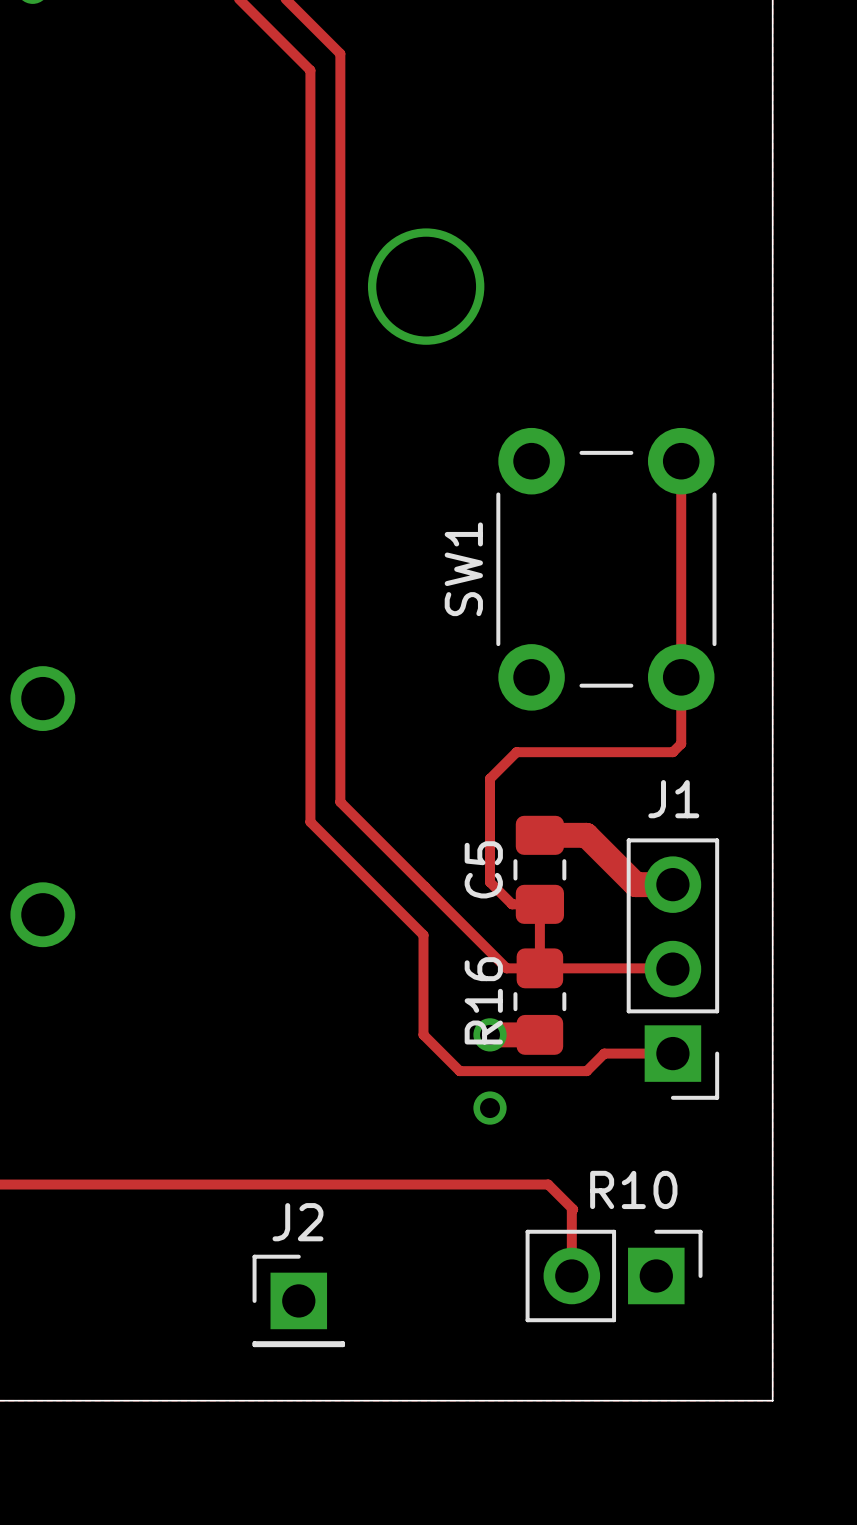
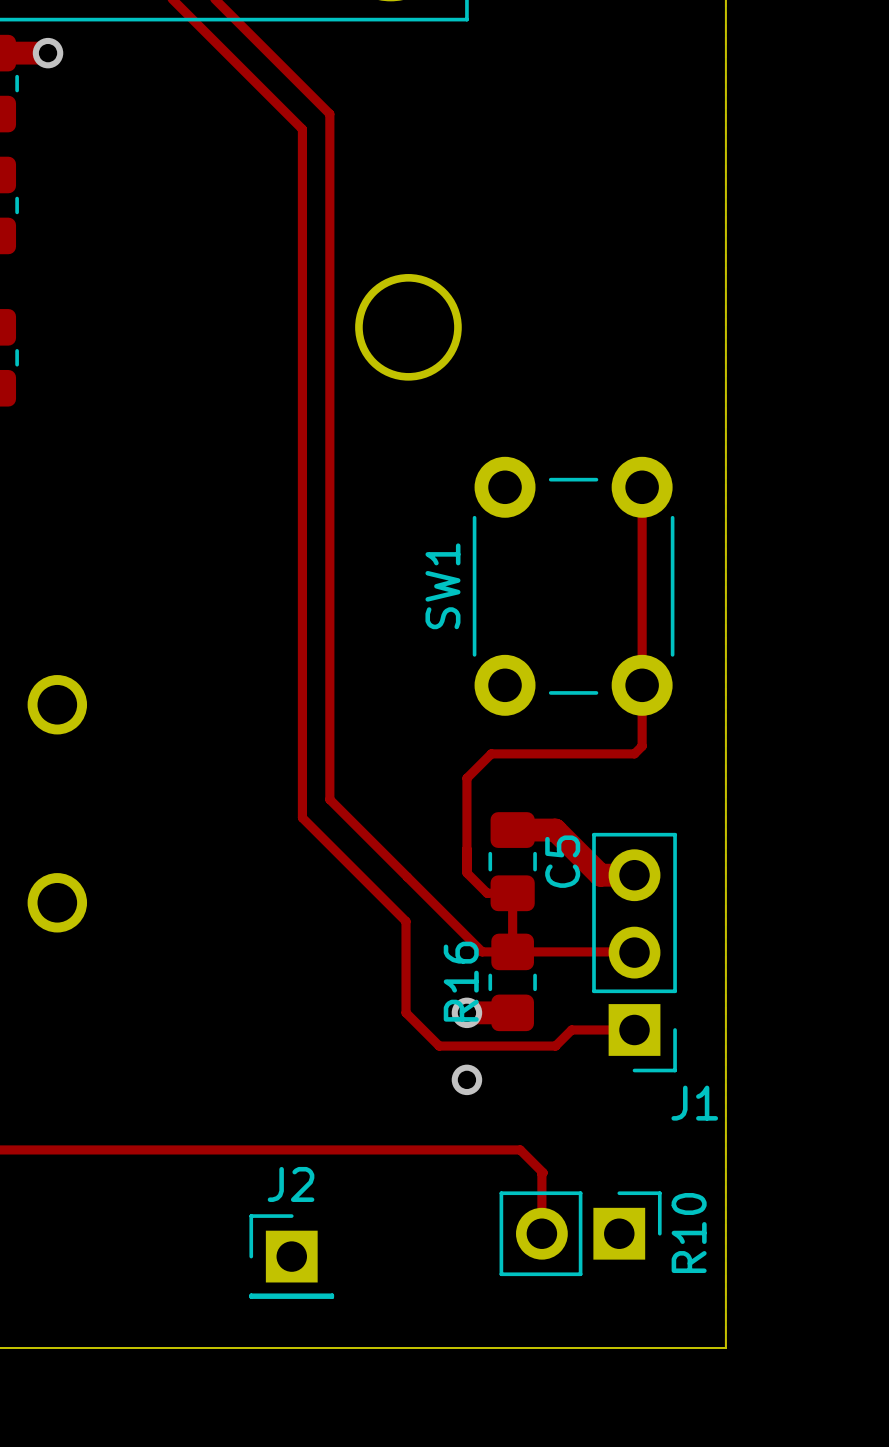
J1 name position: J1 (673, 799) -> J1 (694, 1103)
C5 name position: C5 (483, 869) -> C5 (562, 861)
R10 name rotation: 0° (633, 1189) -> 90° counterclockwise (689, 1233)
R10 name position: R10 (633, 1189) -> R10 (689, 1233)

